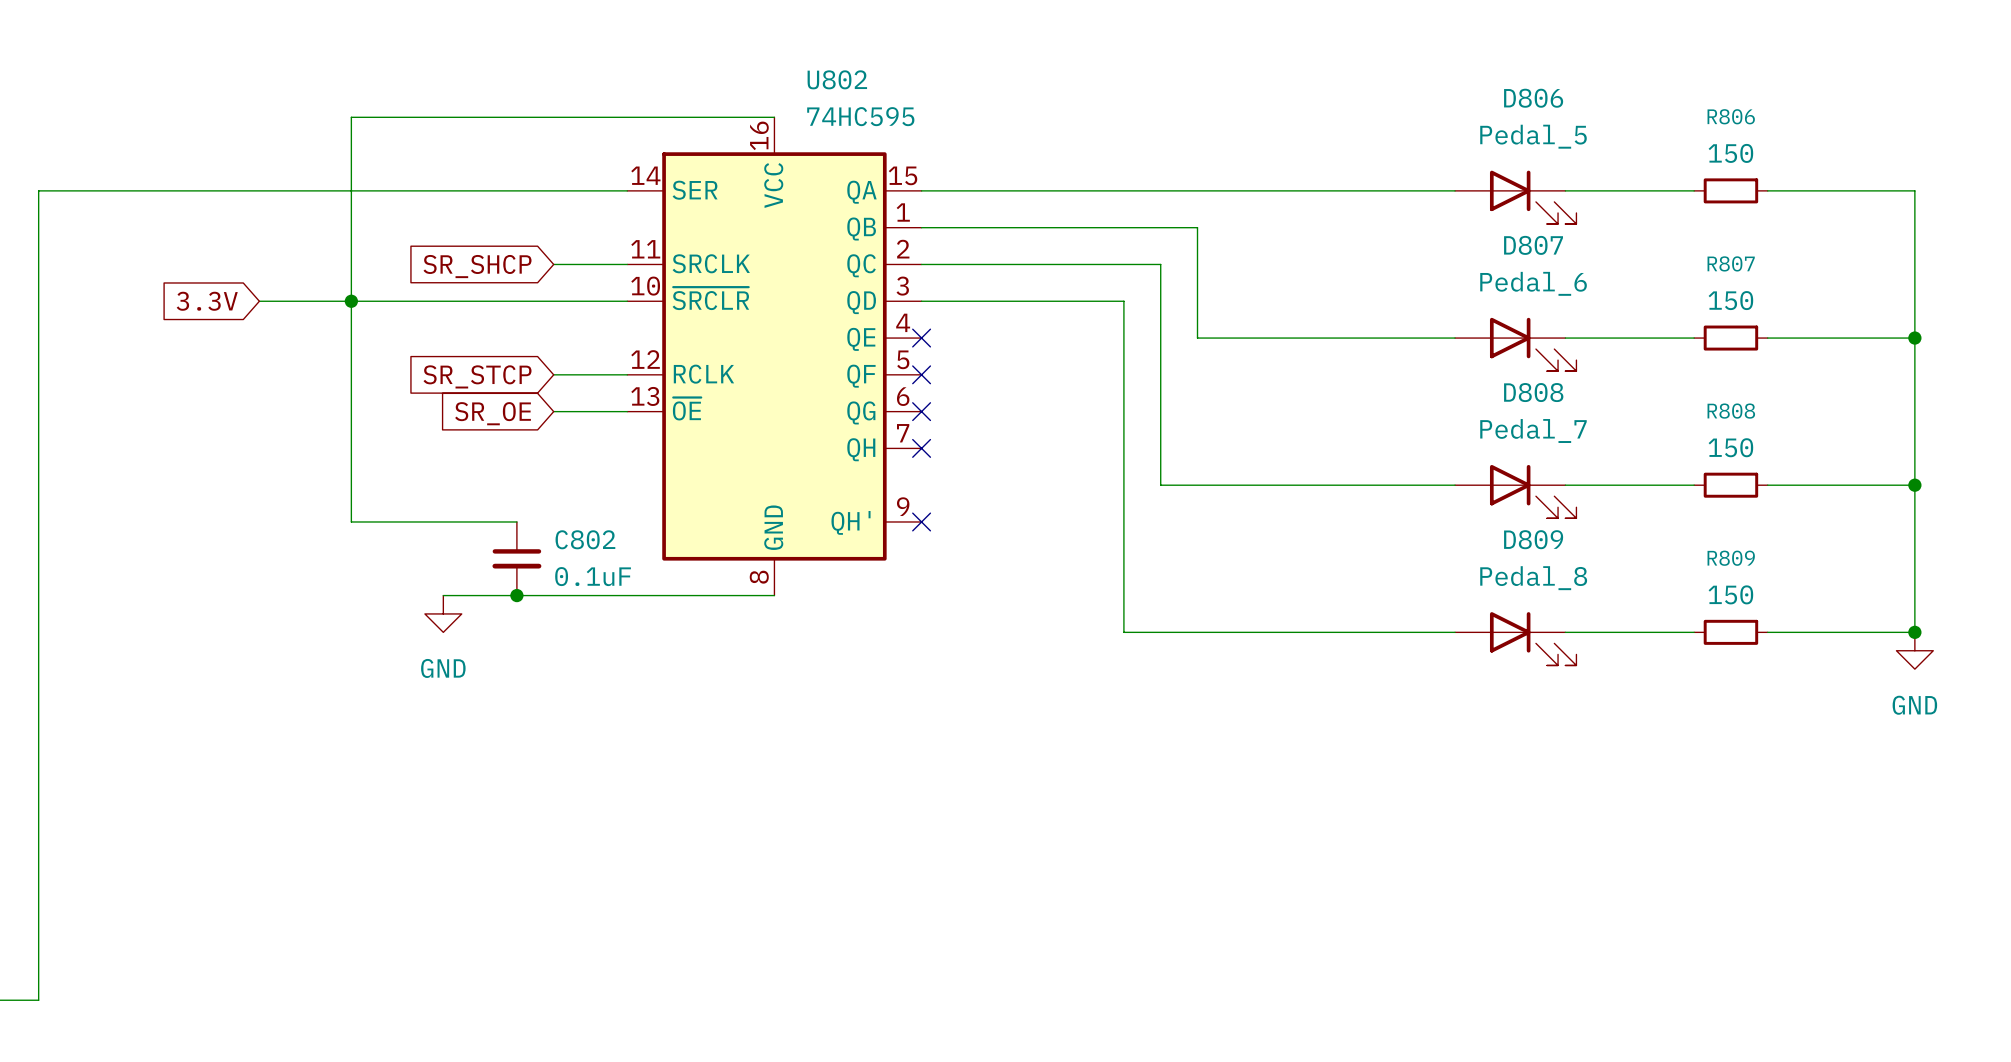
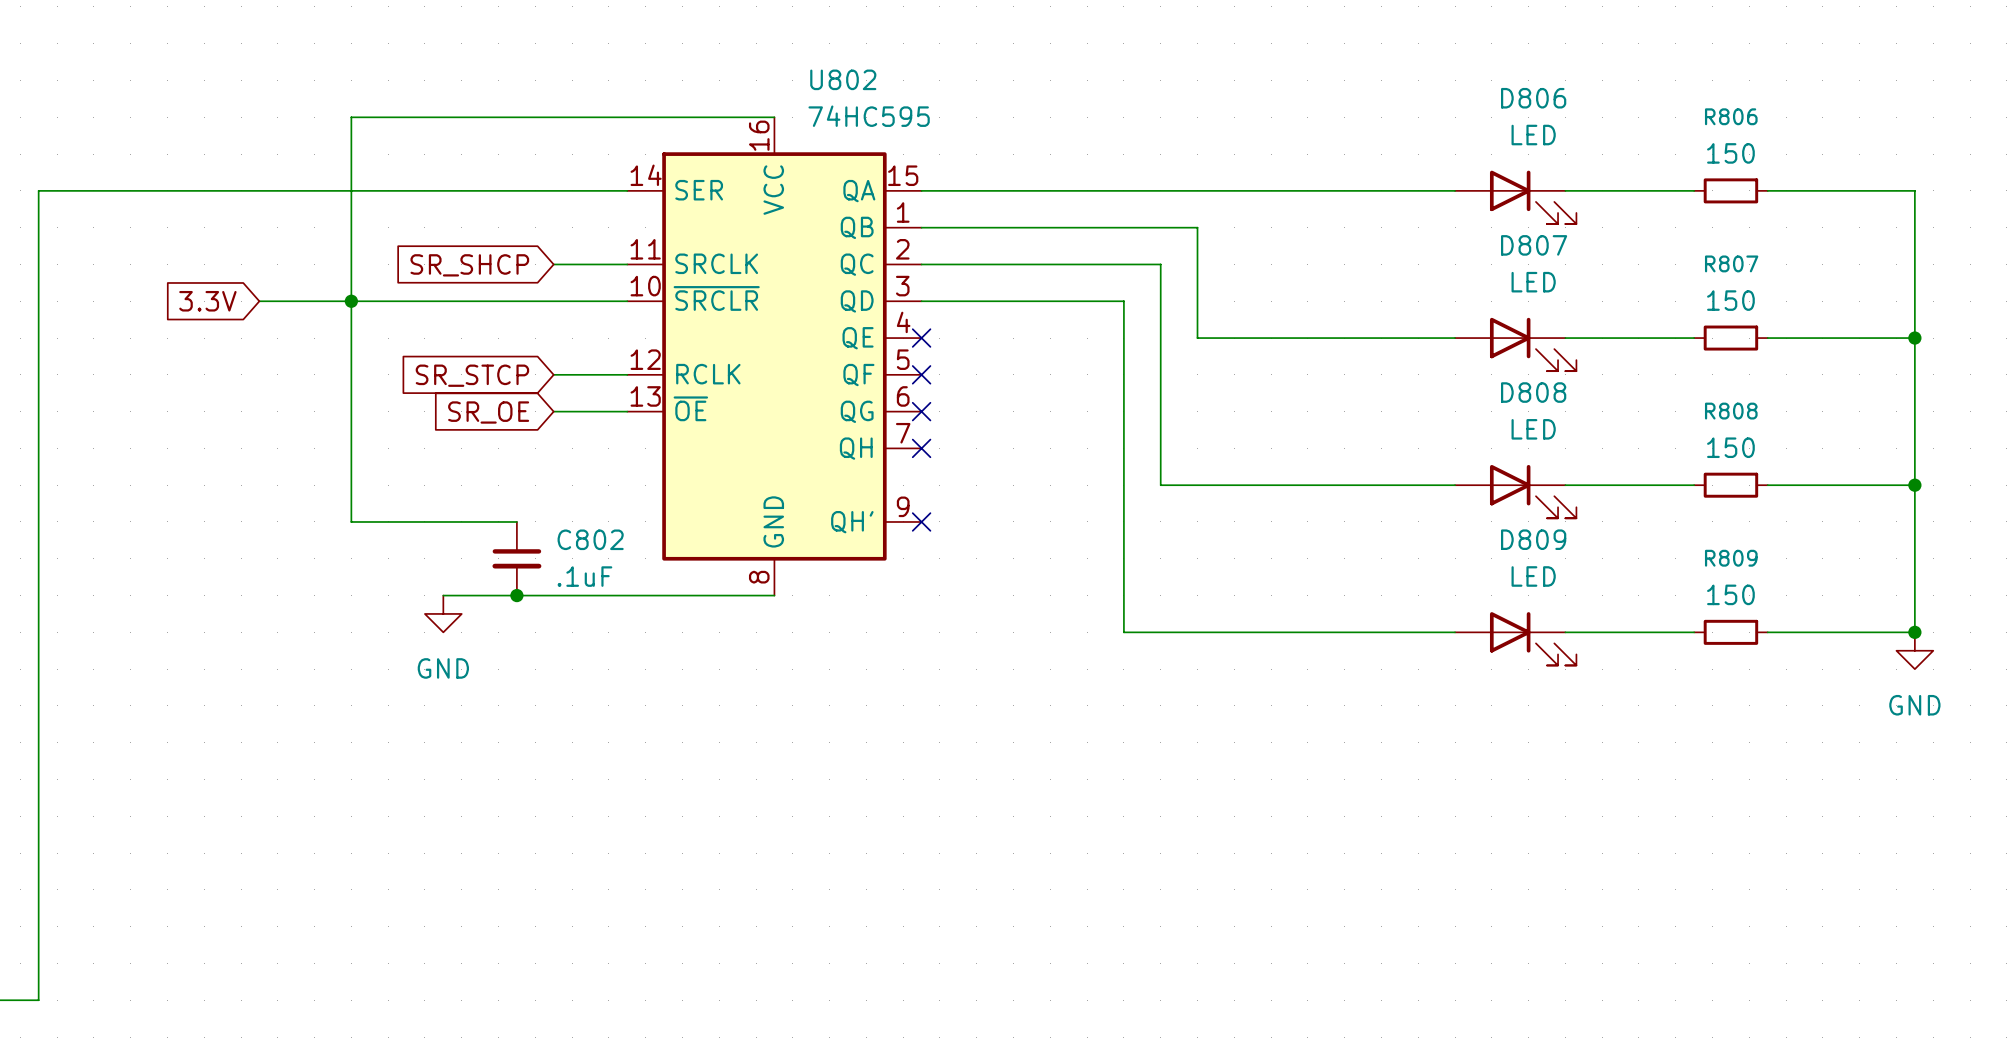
D806 value: Pedal_5 (1533, 136) -> LED (1533, 135)
D807 value: Pedal_6 (1533, 283) -> LED (1533, 282)
D808 value: Pedal_7 (1533, 431) -> LED (1533, 429)
C802 value: 0.1uF (593, 576) -> .1uF (584, 576)
D809 value: Pedal_8 (1533, 578) -> LED (1533, 576)

